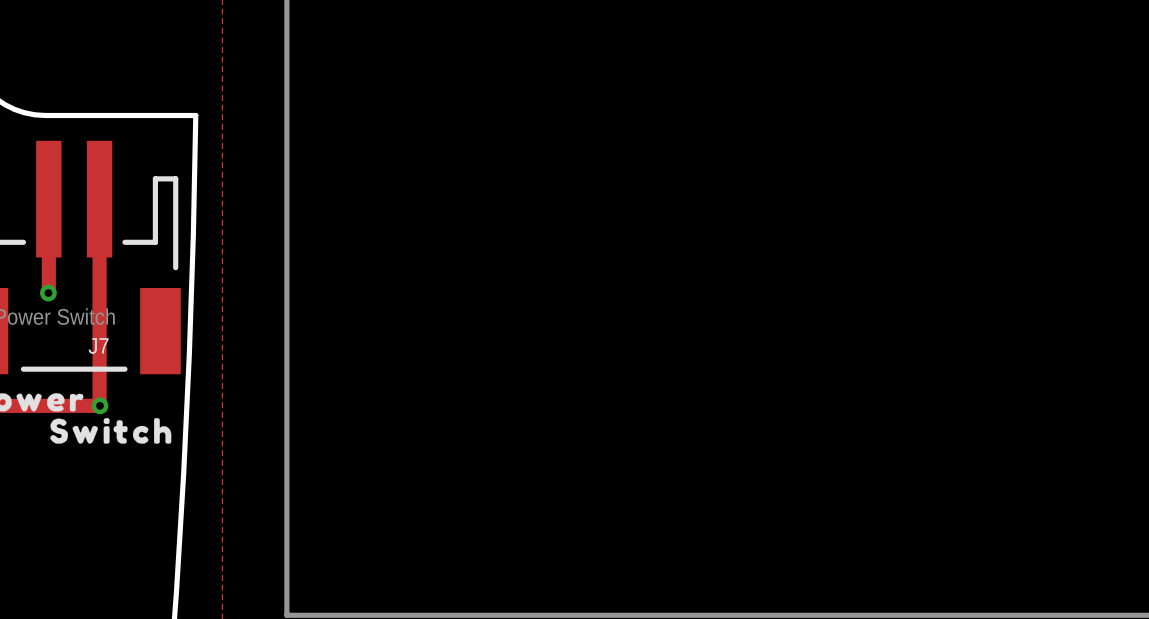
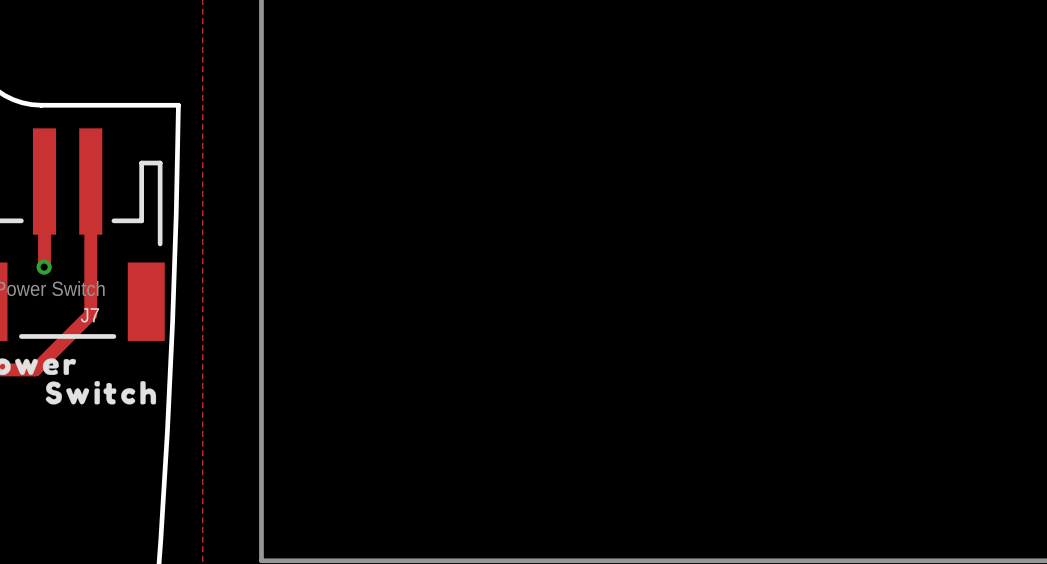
track: (99, 345) (99, 405) -> none
track: (99, 405) (38, 405) -> (90, 314) (35, 369)
via: (99, 405) -> none

